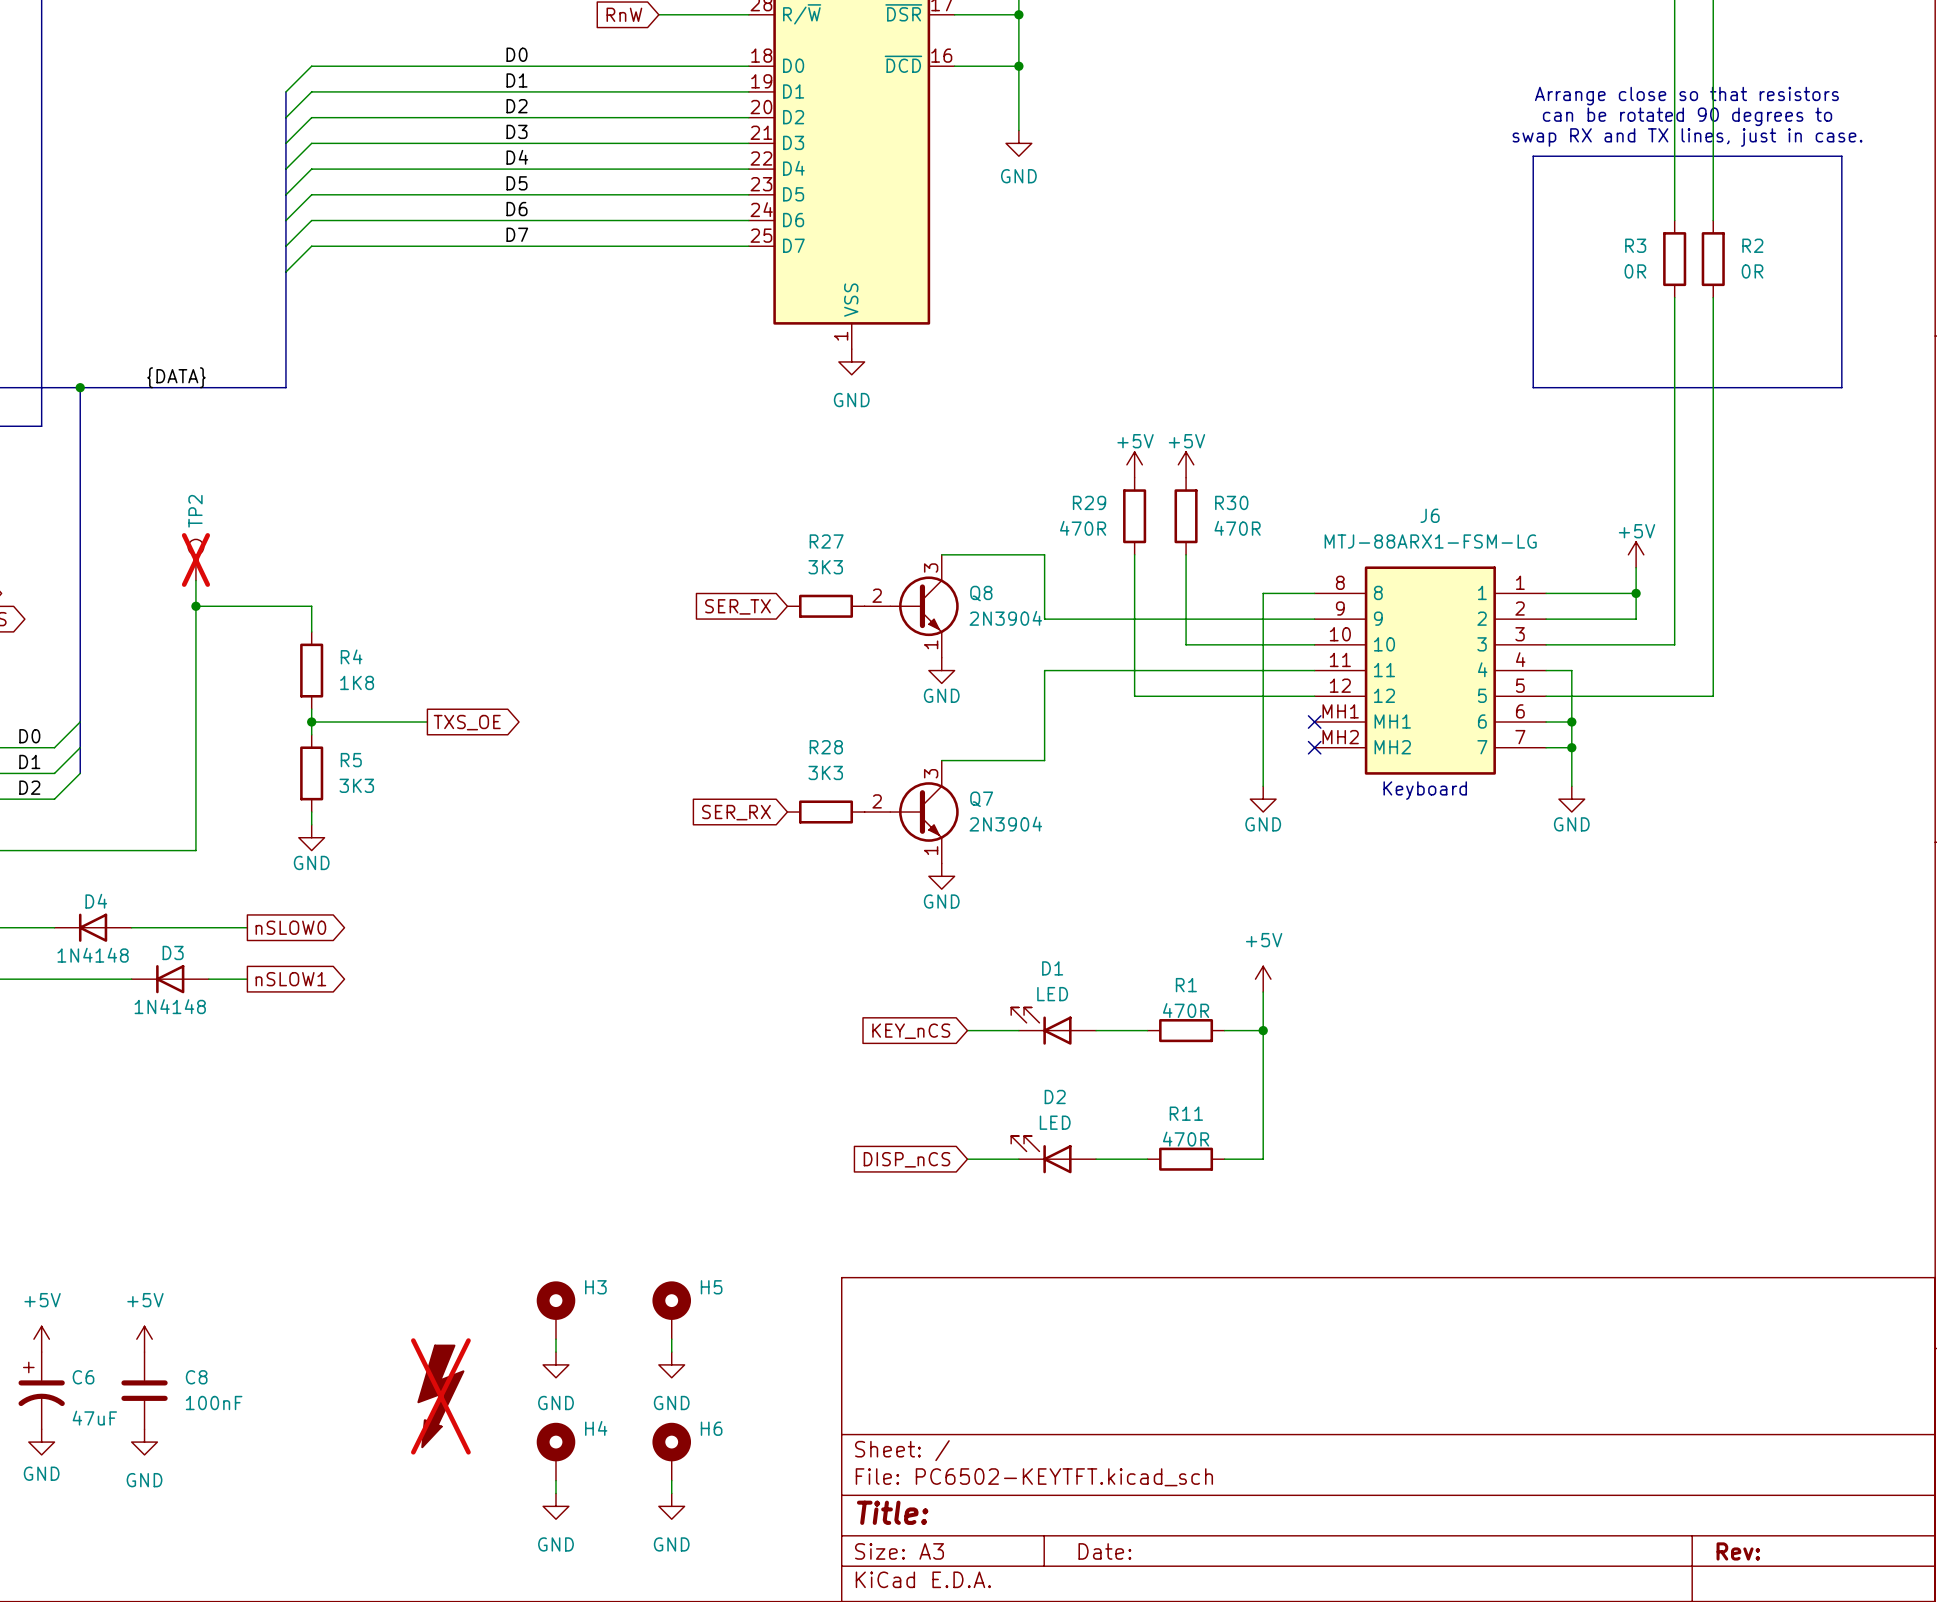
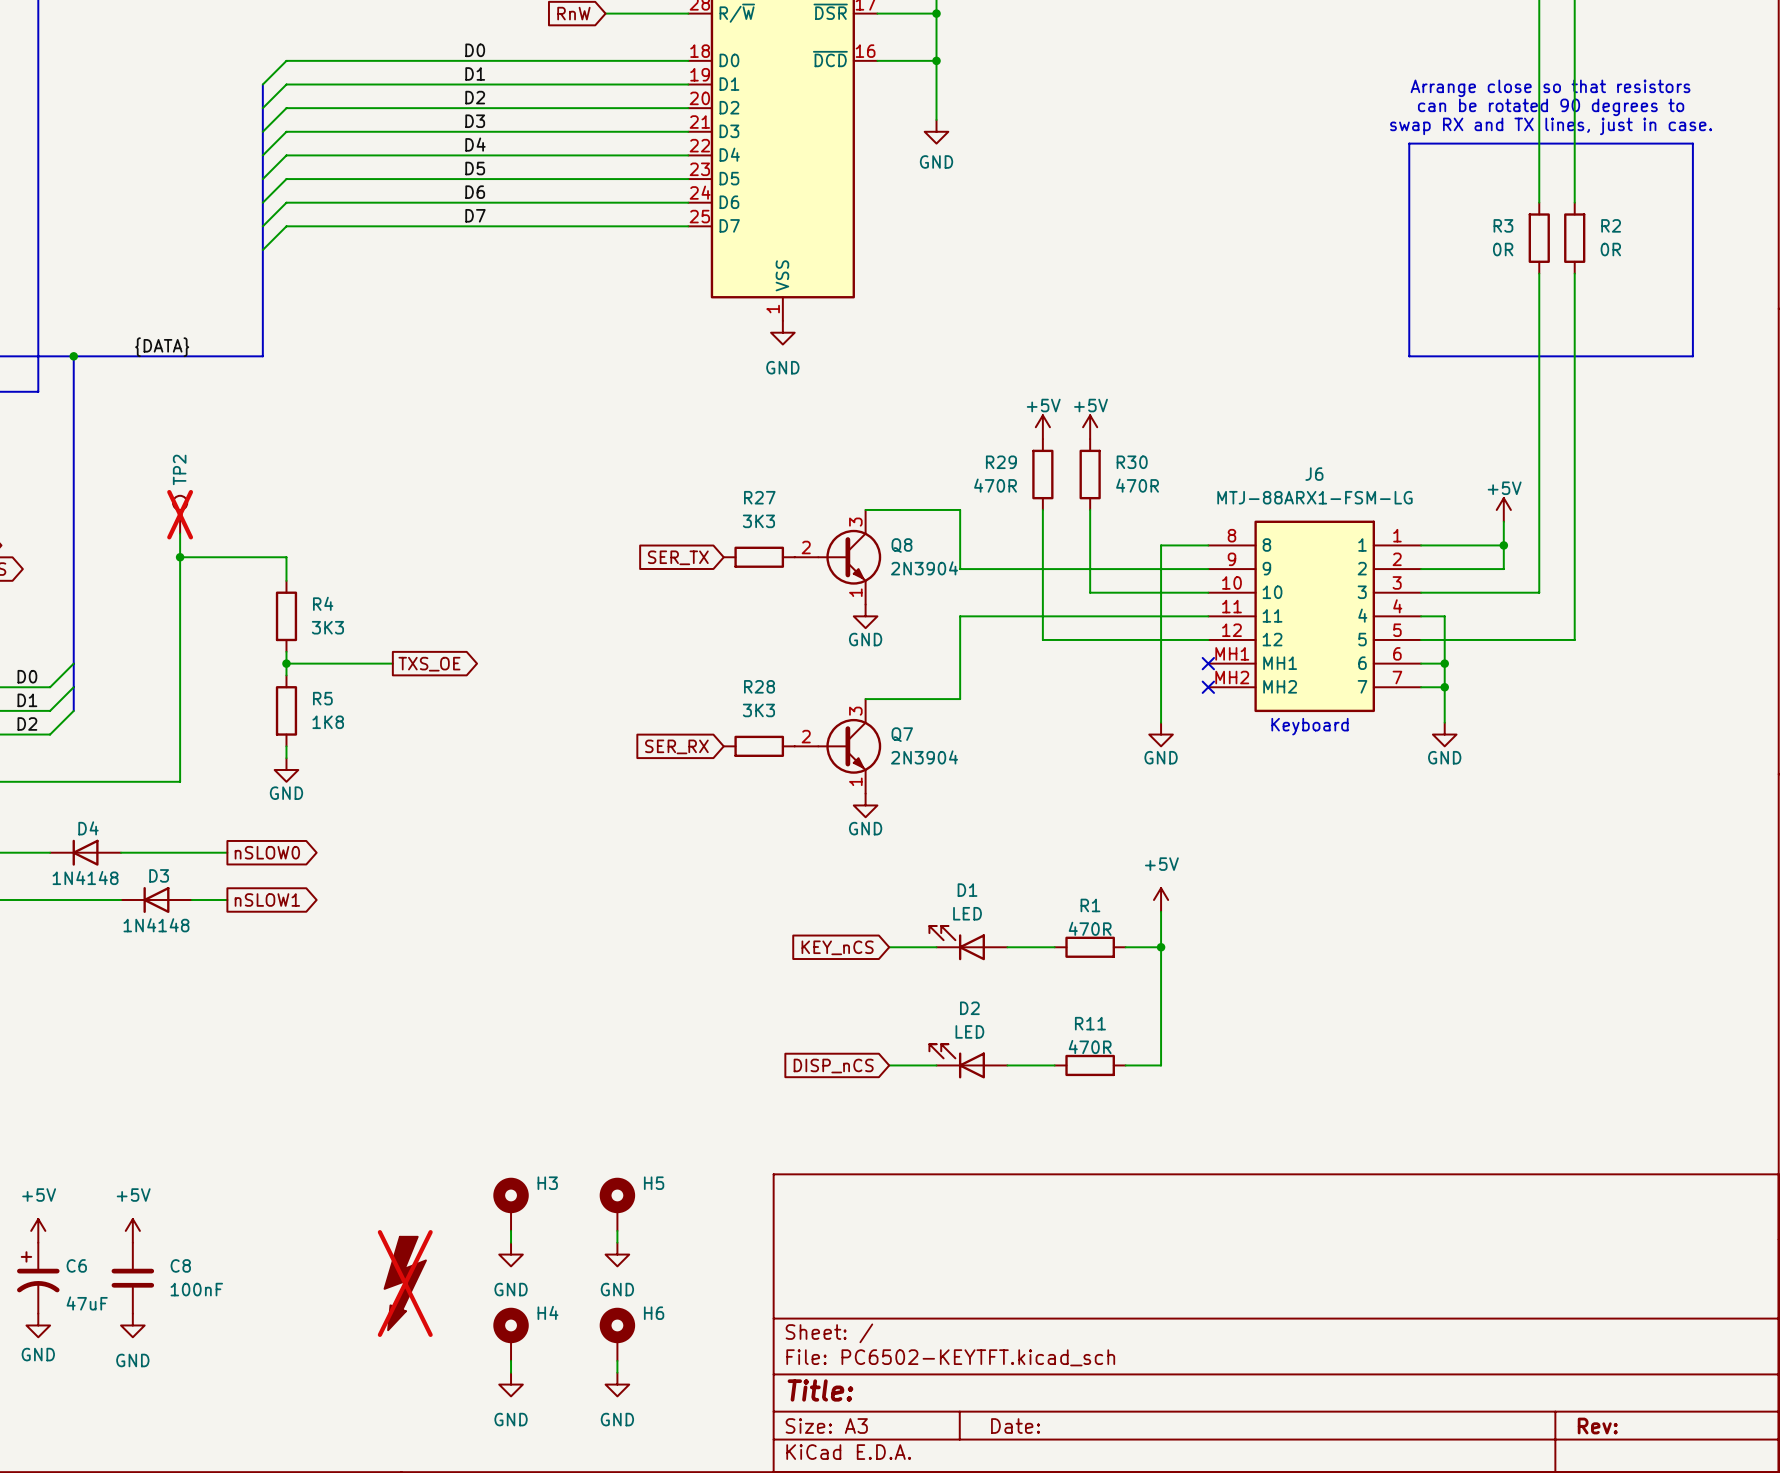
R4 value: 1K8 (357, 682) -> 3K3 (327, 627)
R5 value: 3K3 (356, 785) -> 1K8 (328, 722)

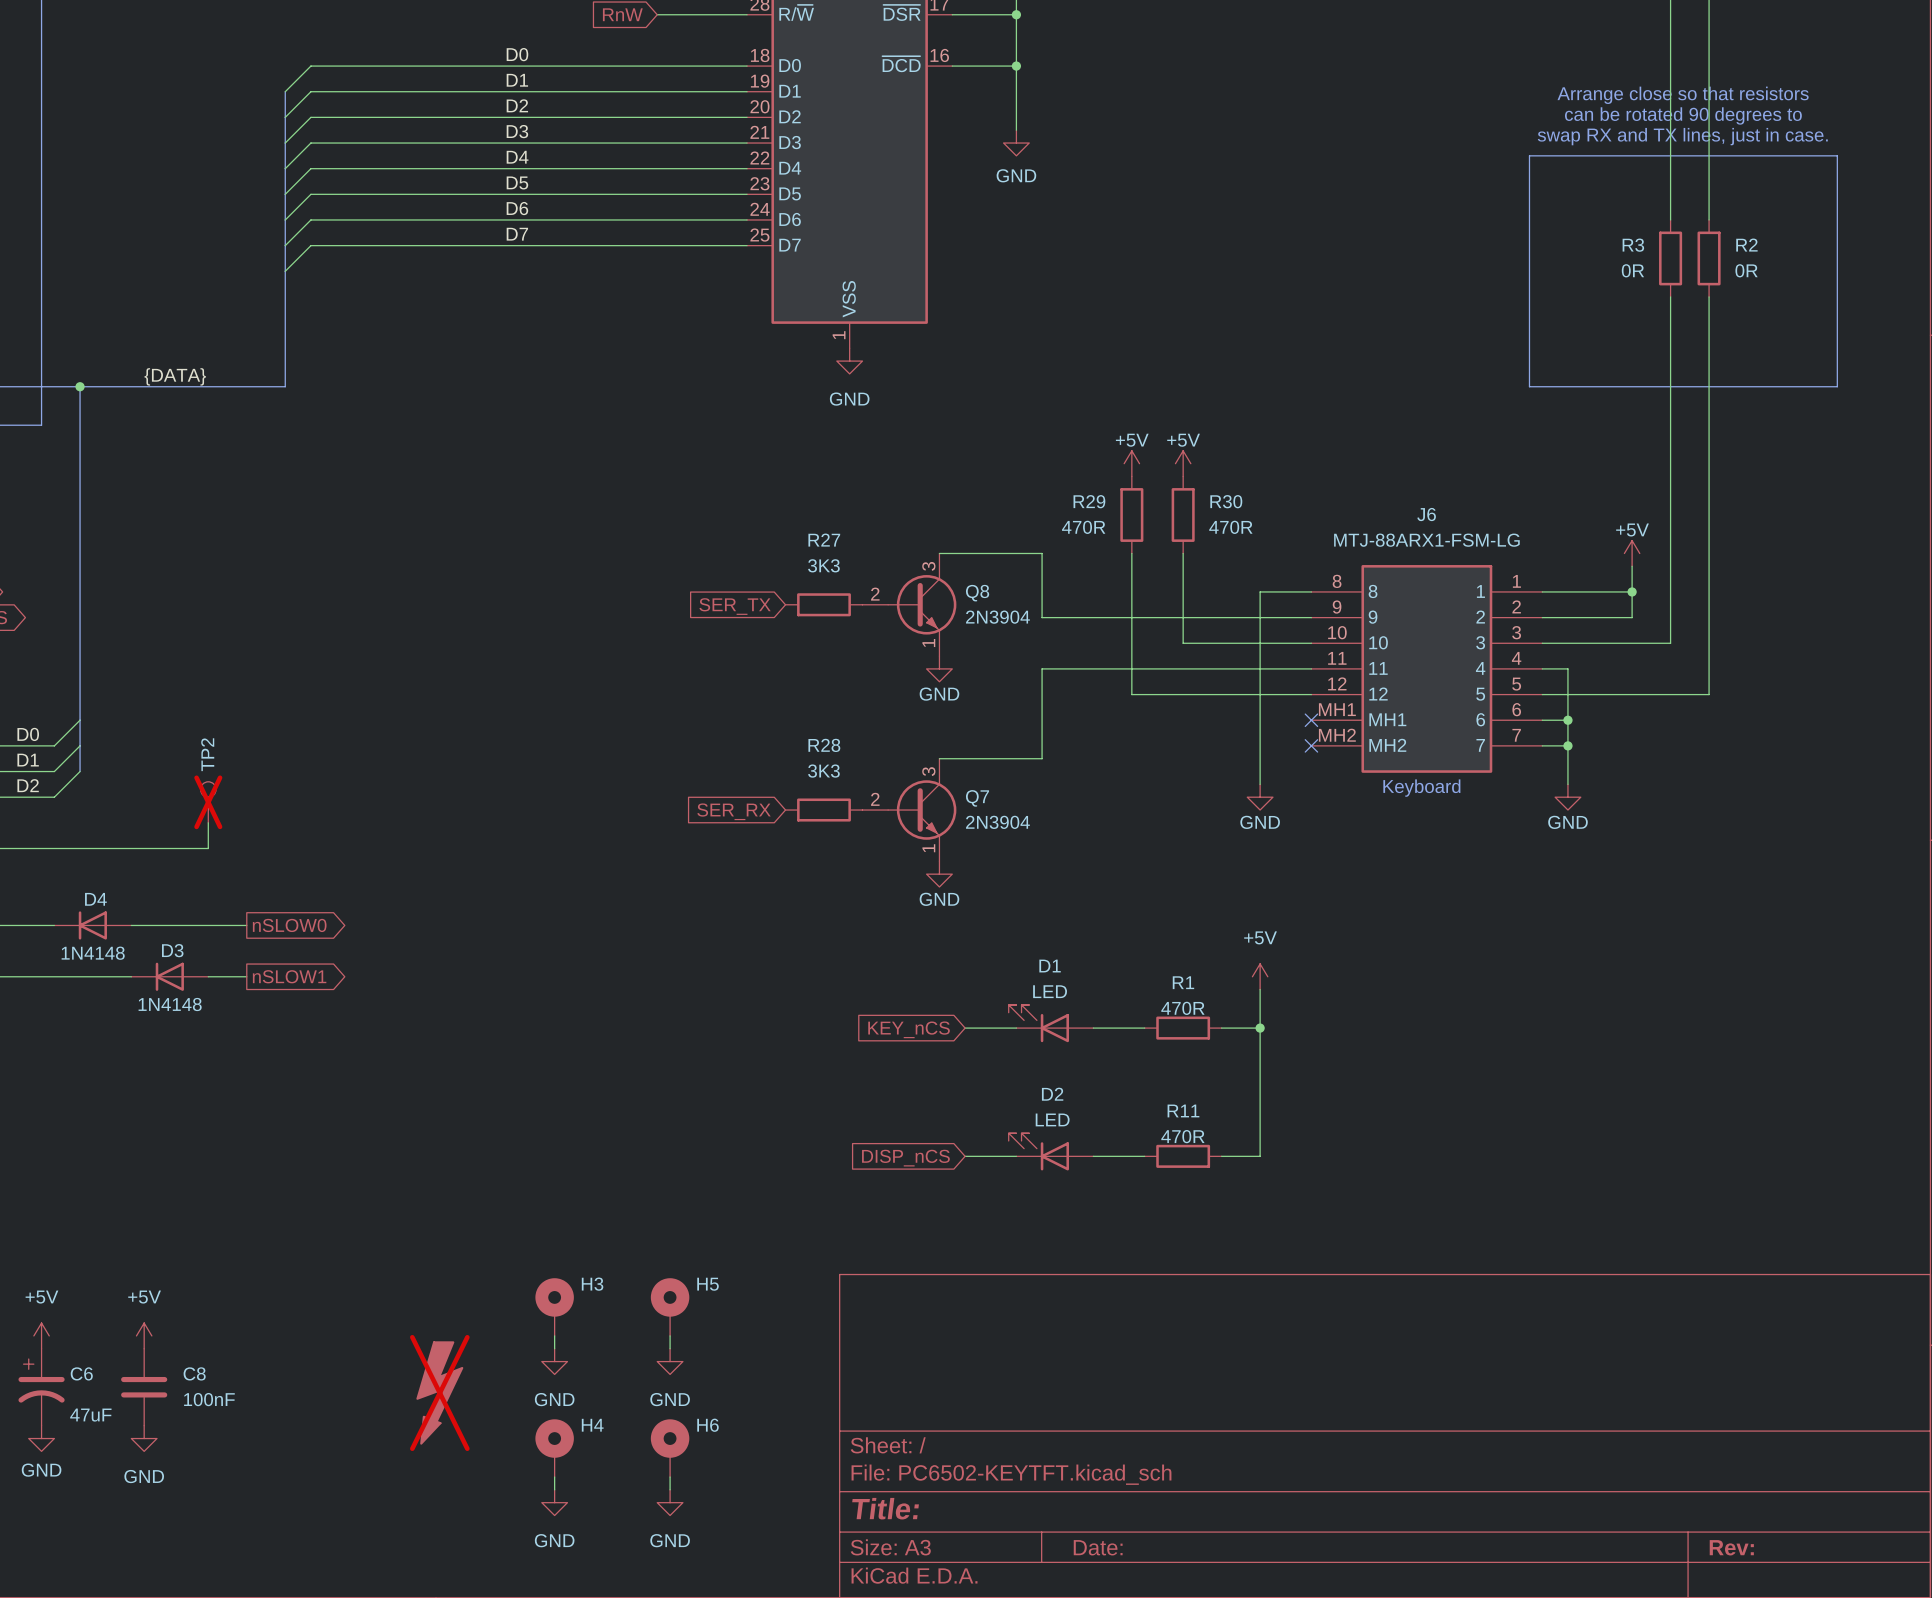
TP2 position: (180, 514) -> (208, 802)
wire: (180, 533) (180, 781) -> (208, 822) (208, 848) (195, 848)
wire: (180, 557) (286, 557) (286, 580) -> none
junction: (180, 557) -> none
R4: 3K3 (286, 616) -> none
wire: (286, 651) (286, 675) -> none
wire: (286, 663) (392, 663) -> none
junction: (286, 663) -> none
global label: TXS_OE (429, 664) -> none
R5: 1K8 (286, 710) -> none
wire: (286, 746) (286, 758) -> none
power symbol: GND (286, 769) -> none

